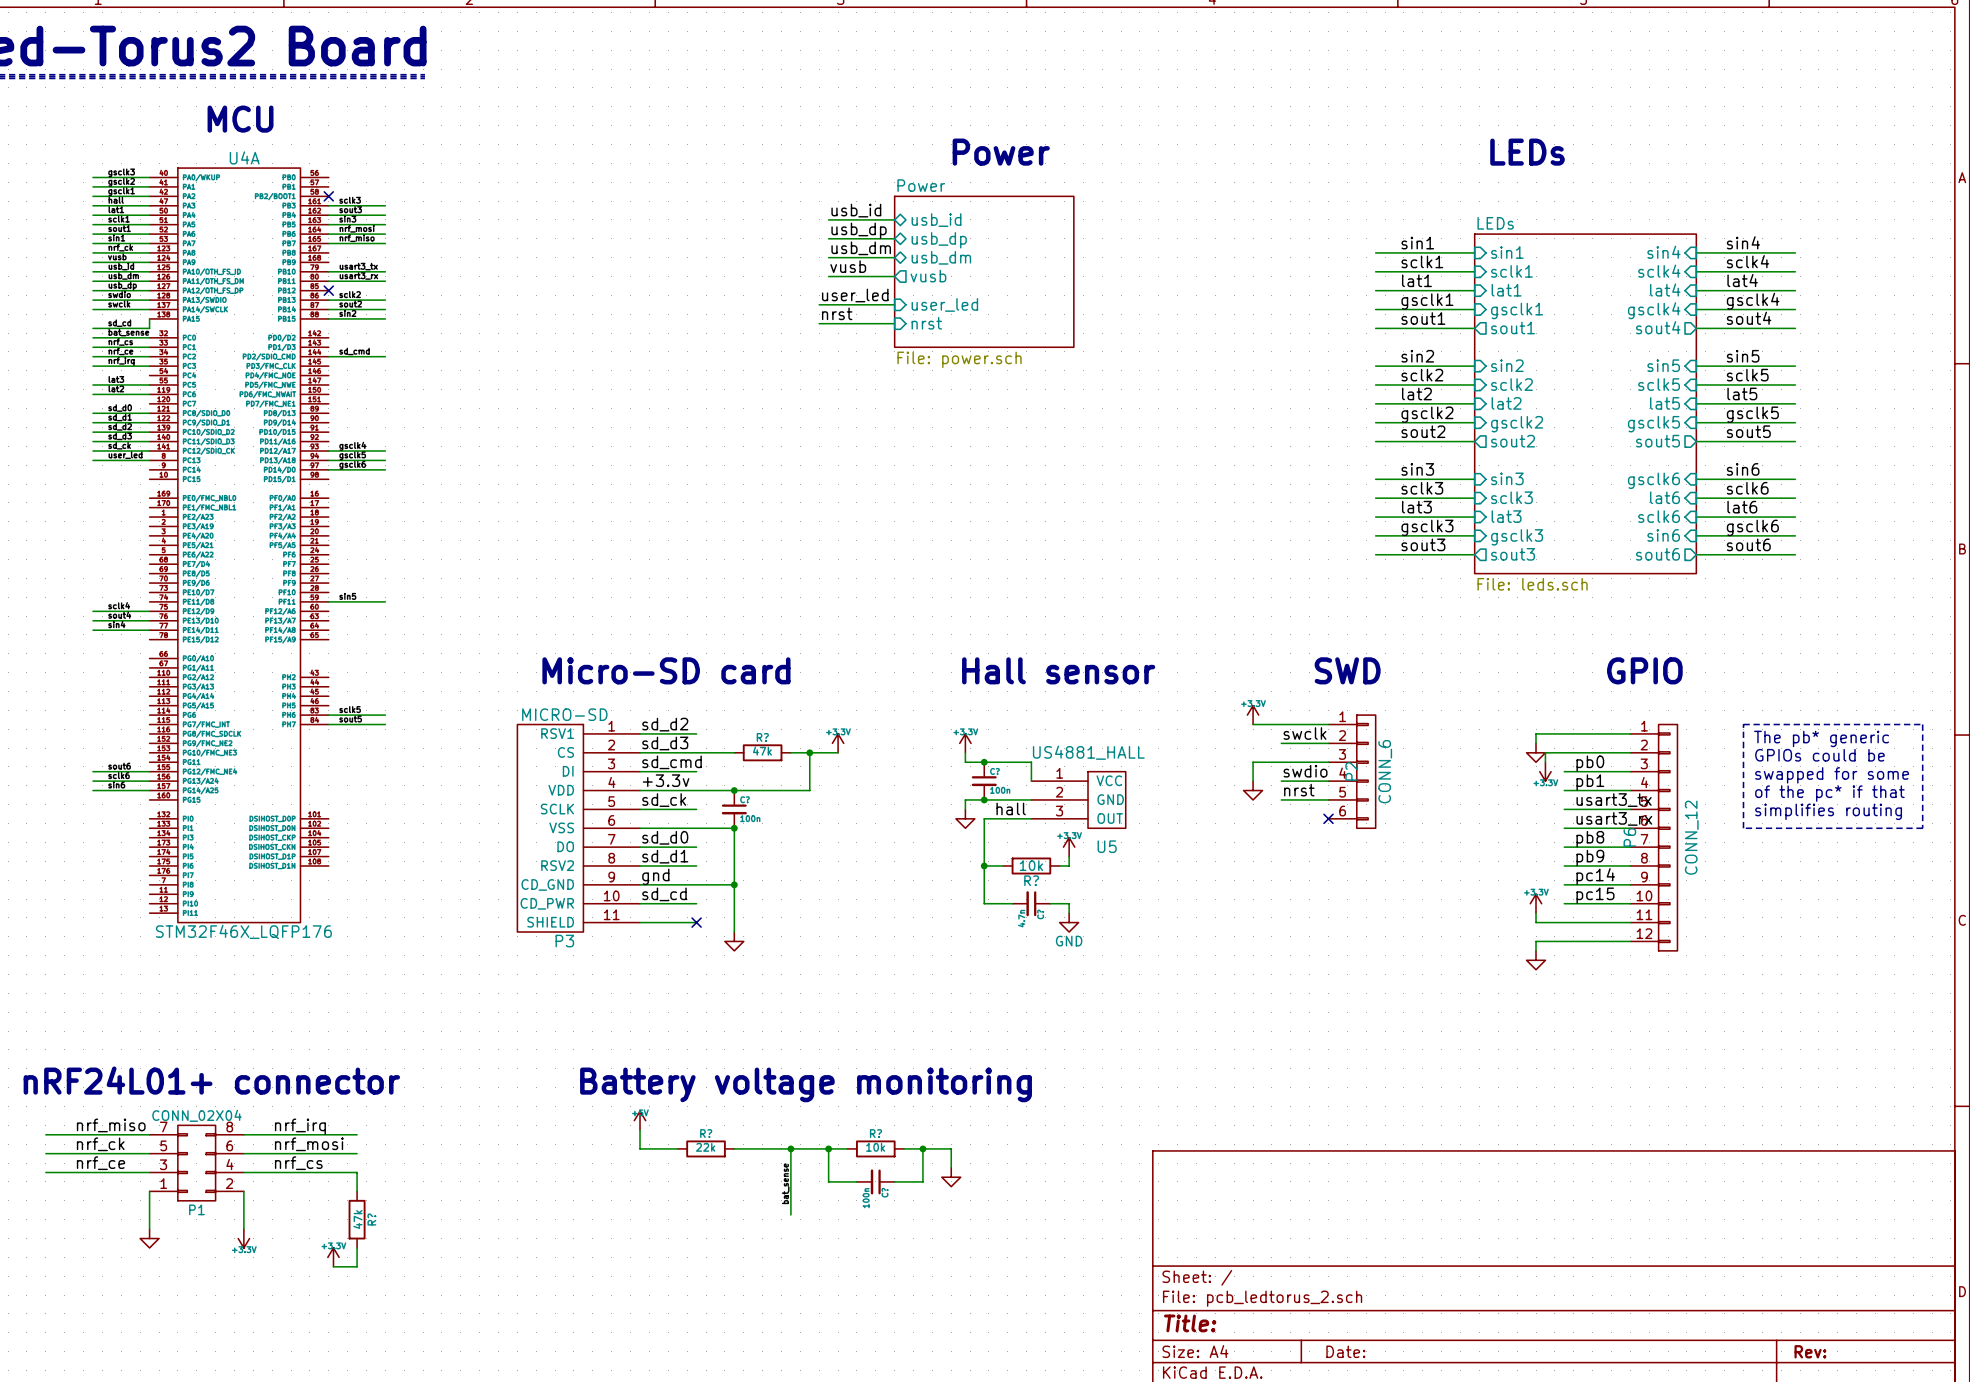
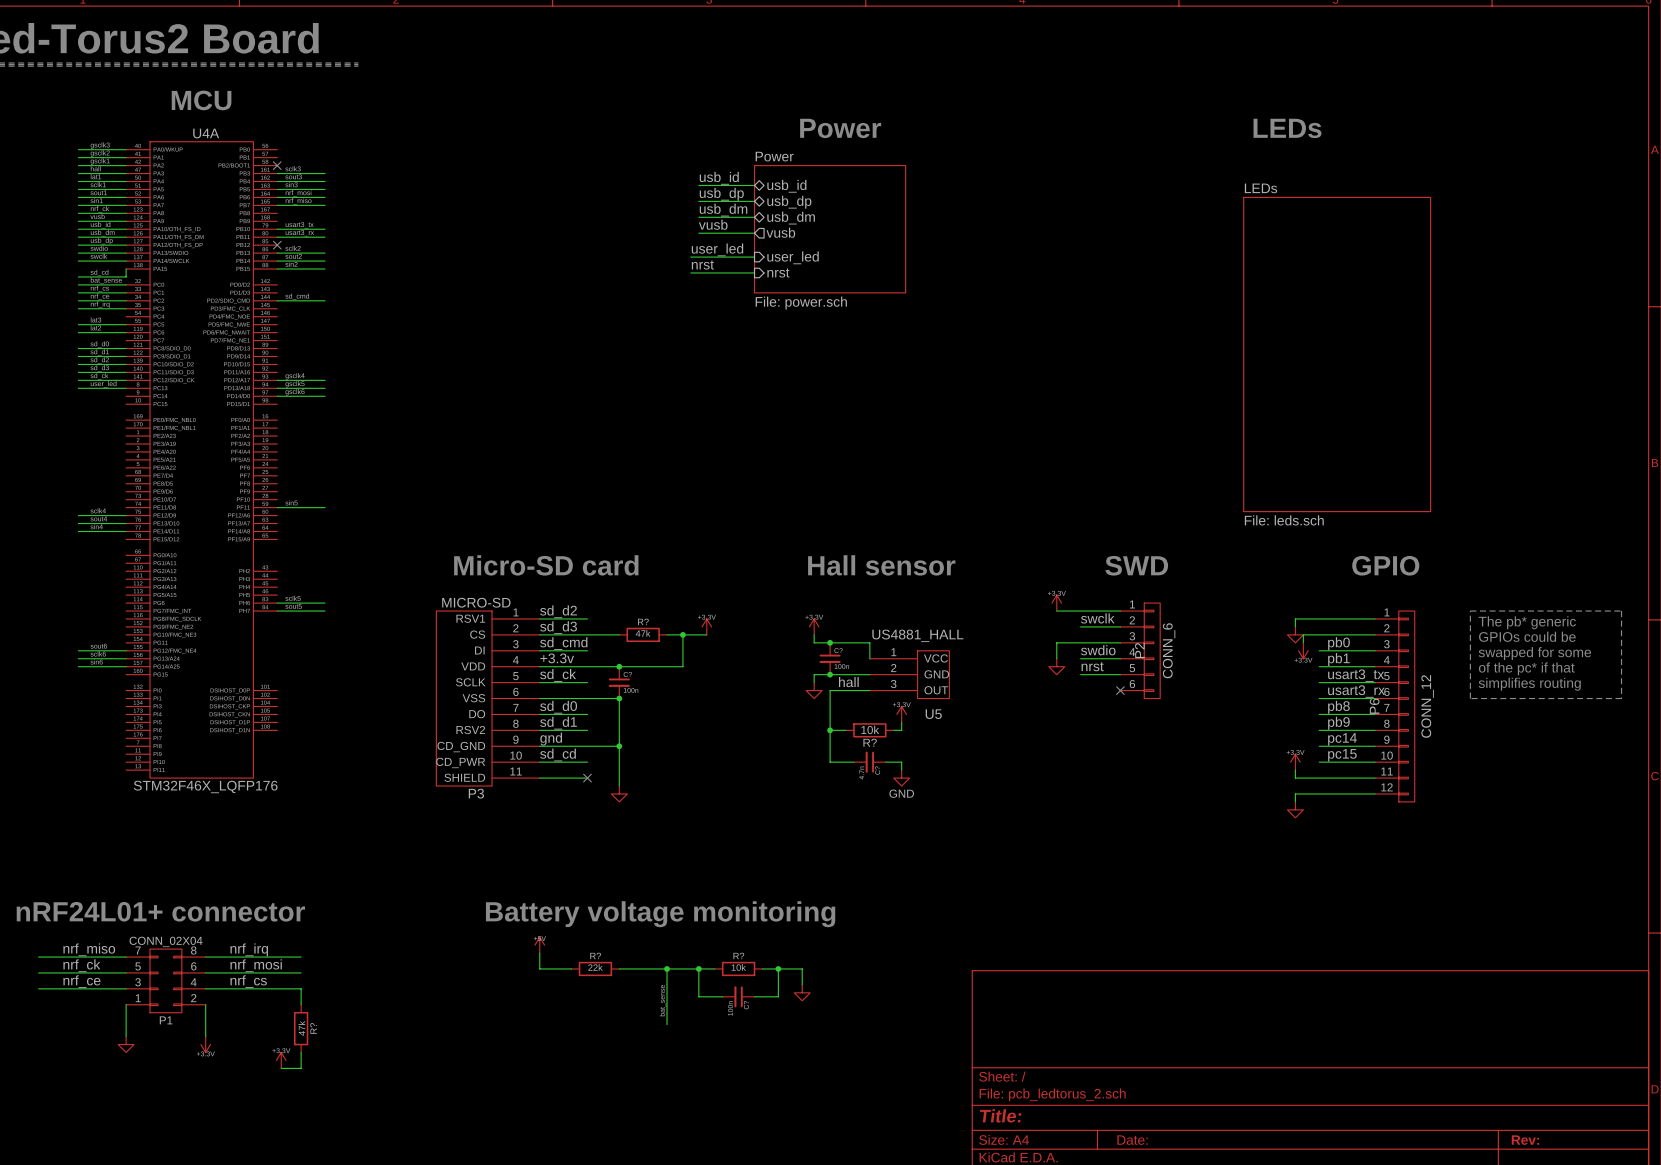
label: sin4 (1743, 242) -> none
label: sin1 (1417, 243) -> none
wire: (1375, 252) (1474, 252) -> none
sheet pin: sin1 (1507, 252) -> none
sheet pin: sin4 (1663, 252) -> none
wire: (1696, 252) (1795, 252) -> none
label: sclk1 (1422, 261) -> none
label: sclk4 (1748, 261) -> none
wire: (1375, 271) (1474, 271) -> none
sheet pin: sclk1 (1511, 271) -> none
sheet pin: sclk4 (1659, 271) -> none
wire: (1696, 271) (1795, 271) -> none
label: lat1 (1416, 280) -> none
label: lat4 (1742, 280) -> none
sheet pin: lat4 (1665, 289) -> none
wire: (1375, 290) (1474, 290) -> none
sheet pin: lat1 (1506, 290) -> none
wire: (1696, 290) (1795, 290) -> none
label: gsclk1 (1427, 301) -> none
label: gsclk4 (1753, 301) -> none
wire: (1375, 309) (1474, 309) -> none
wire: (1696, 309) (1795, 309) -> none
sheet pin: gsclk4 (1654, 310) -> none
sheet pin: gsclk1 (1517, 311) -> none
label: sout1 (1423, 318) -> none
label: sout4 (1749, 318) -> none
sheet pin: sout1 (1513, 327) -> none
sheet pin: sout4 (1658, 327) -> none
wire: (1375, 328) (1474, 328) -> none
wire: (1696, 328) (1795, 328) -> none
label: sin2 (1417, 356) -> none
label: sin5 (1743, 356) -> none
sheet pin: sin2 (1507, 365) -> none
sheet pin: sin5 (1663, 365) -> none
wire: (1375, 366) (1474, 366) -> none
wire: (1696, 366) (1795, 366) -> none
label: sclk2 (1422, 375) -> none
label: sclk5 (1747, 375) -> none
wire: (1375, 384) (1474, 384) -> none
sheet pin: sclk2 (1511, 384) -> none
sheet pin: sclk5 (1659, 384) -> none
wire: (1696, 384) (1795, 384) -> none
label: lat2 (1416, 393) -> none
label: lat5 (1742, 393) -> none
wire: (1375, 403) (1474, 403) -> none
sheet pin: lat2 (1506, 403) -> none
sheet LEDs: File: leds.sch (1585, 403) -> none
sheet pin: lat5 (1665, 403) -> none
wire: (1696, 403) (1795, 403) -> none
label: gsclk2 (1427, 414) -> none
label: gsclk5 (1752, 414) -> none
sheet LEDs: none -> File: leds.sch (1337, 354)
wire: (1375, 422) (1474, 422) -> none
wire: (1696, 422) (1795, 422) -> none
sheet pin: gsclk2 (1517, 424) -> none
sheet pin: gsclk5 (1653, 424) -> none
label: sout2 (1423, 431) -> none
label: sout5 (1748, 431) -> none
wire: (1375, 441) (1474, 441) -> none
sheet pin: sout2 (1513, 441) -> none
sheet pin: sout5 (1657, 441) -> none
wire: (1696, 441) (1795, 441) -> none
label: sin3 (1417, 469) -> none
label: sin6 (1743, 469) -> none
sheet pin: sin3 (1507, 478) -> none
wire: (1375, 479) (1474, 479) -> none
wire: (1696, 479) (1795, 479) -> none
sheet pin: gsclk6 (1653, 480) -> none
label: sclk3 (1422, 488) -> none
label: sclk6 (1747, 488) -> none
sheet pin: sclk3 (1511, 497) -> none
sheet pin: lat6 (1665, 497) -> none
wire: (1375, 498) (1474, 498) -> none
wire: (1696, 498) (1795, 498) -> none
label: lat3 (1416, 507) -> none
label: lat6 (1742, 507) -> none
sheet pin: lat3 (1506, 516) -> none
sheet pin: sclk6 (1659, 516) -> none
wire: (1375, 517) (1474, 517) -> none
wire: (1696, 517) (1795, 517) -> none
label: gsclk3 (1427, 527) -> none
label: gsclk6 (1752, 527) -> none
wire: (1375, 535) (1474, 535) -> none
sheet pin: sin6 (1663, 535) -> none
wire: (1696, 535) (1795, 535) -> none
sheet pin: gsclk3 (1517, 537) -> none
label: sout3 (1423, 544) -> none
label: sout6 (1748, 544) -> none
wire: (1375, 554) (1474, 554) -> none
sheet pin: sout3 (1513, 554) -> none
sheet pin: sout6 (1657, 554) -> none
wire: (1696, 554) (1795, 554) -> none

